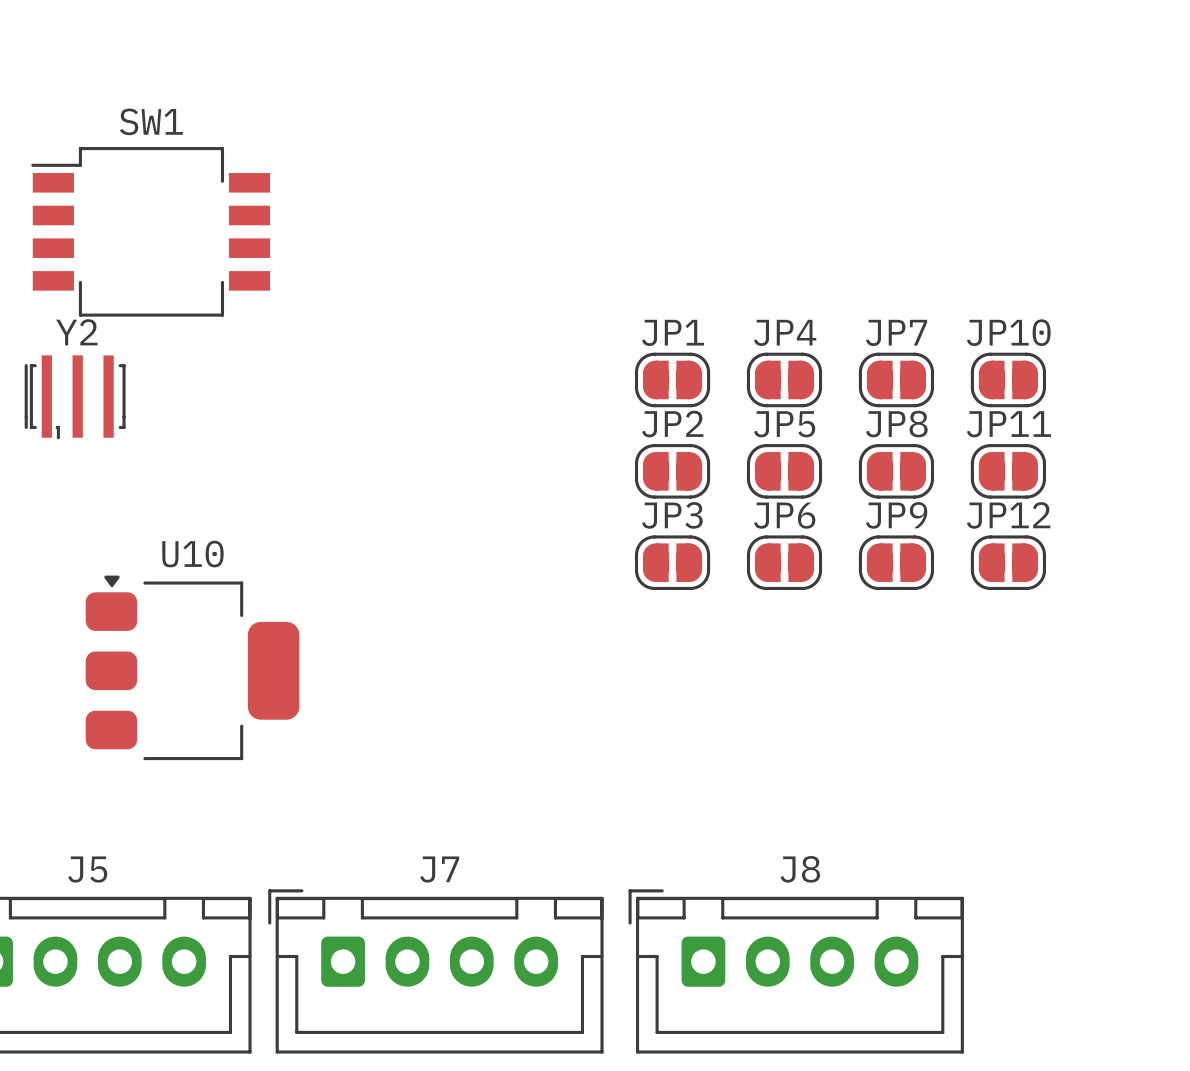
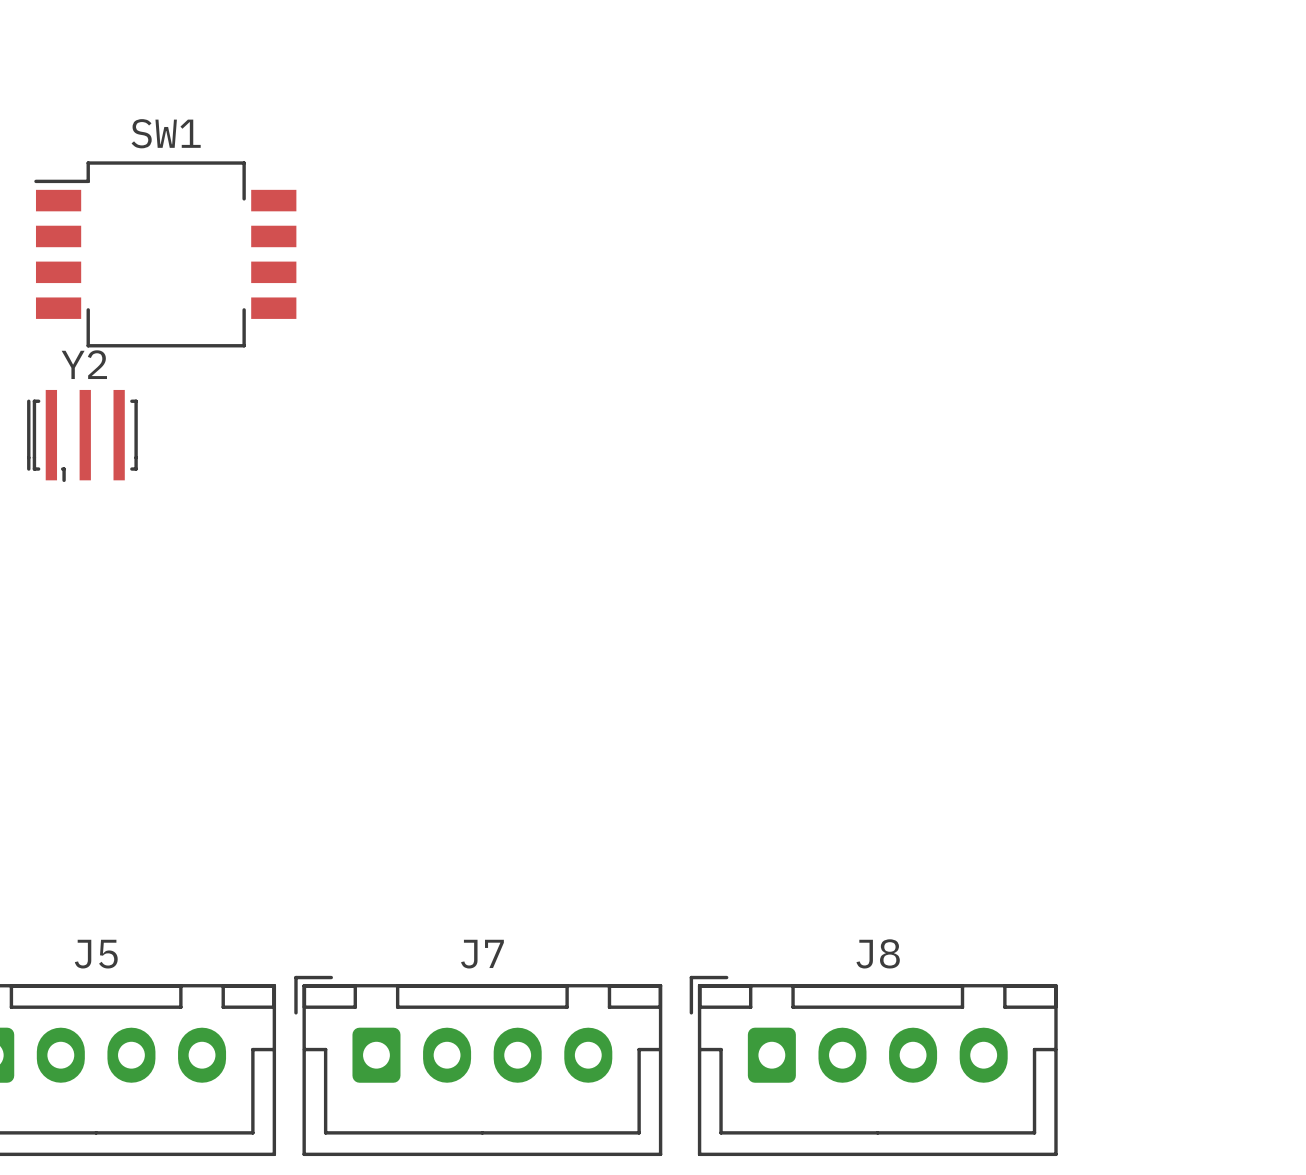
JP1: (672, 379) -> none
JP4: (784, 379) -> none
JP7: (896, 379) -> none
JP10: (1008, 379) -> none
JP2: (672, 471) -> none
JP5: (784, 471) -> none
JP8: (896, 471) -> none
JP11: (1008, 471) -> none
JP3: (672, 562) -> none
JP6: (784, 562) -> none
JP9: (896, 562) -> none
JP12: (1008, 562) -> none
U10: (192, 667) -> none

